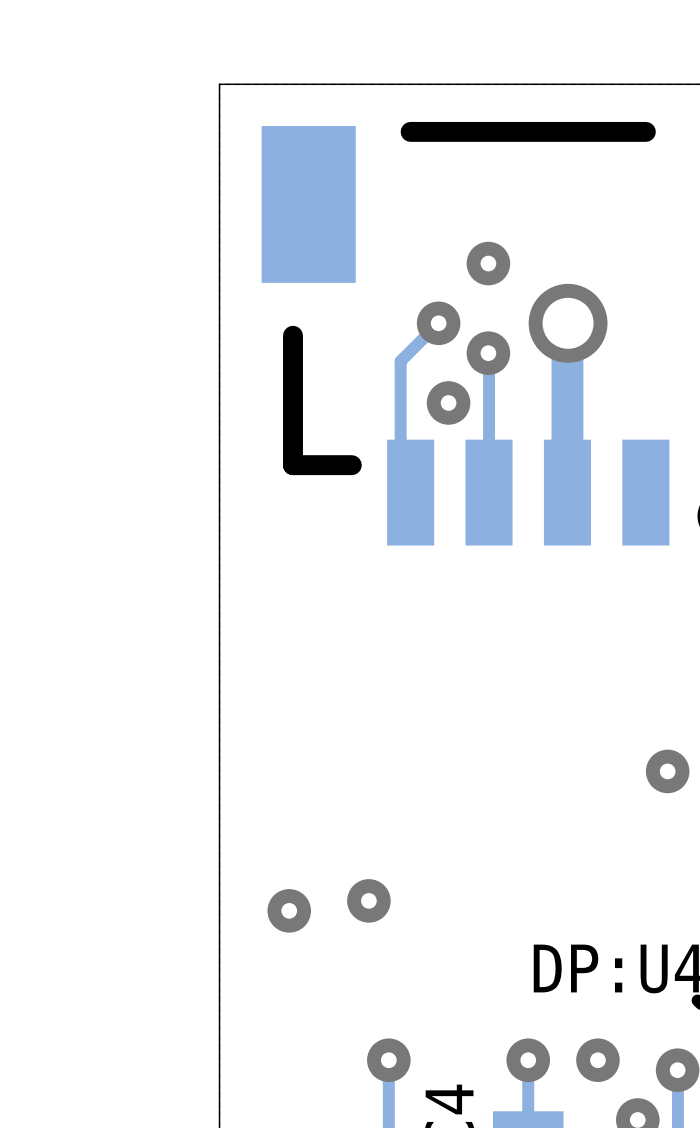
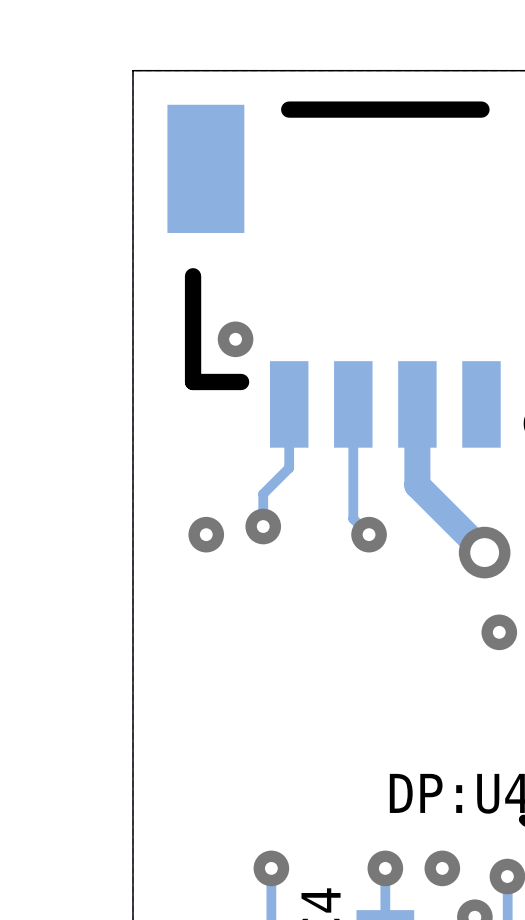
via: (488, 263) -> none
track: (438, 323) (400, 361) (400, 482) (410, 492) -> (263, 526) (263, 493) (289, 468) (289, 404)
via: (438, 323) -> none
track: (567, 323) (567, 492) -> (484, 552) (417, 485) (417, 404)
via: (568, 323) -> none
via: (488, 353) -> none
track: (489, 353) (489, 492) -> (369, 534) (353, 518) (353, 404)
via: (448, 402) -> none
via: none -> (235, 339)
via: none -> (263, 526)
via: none -> (206, 534)
via: none -> (369, 534)
via: none -> (484, 552)
via: (368, 900) -> none
via: (289, 910) -> none

